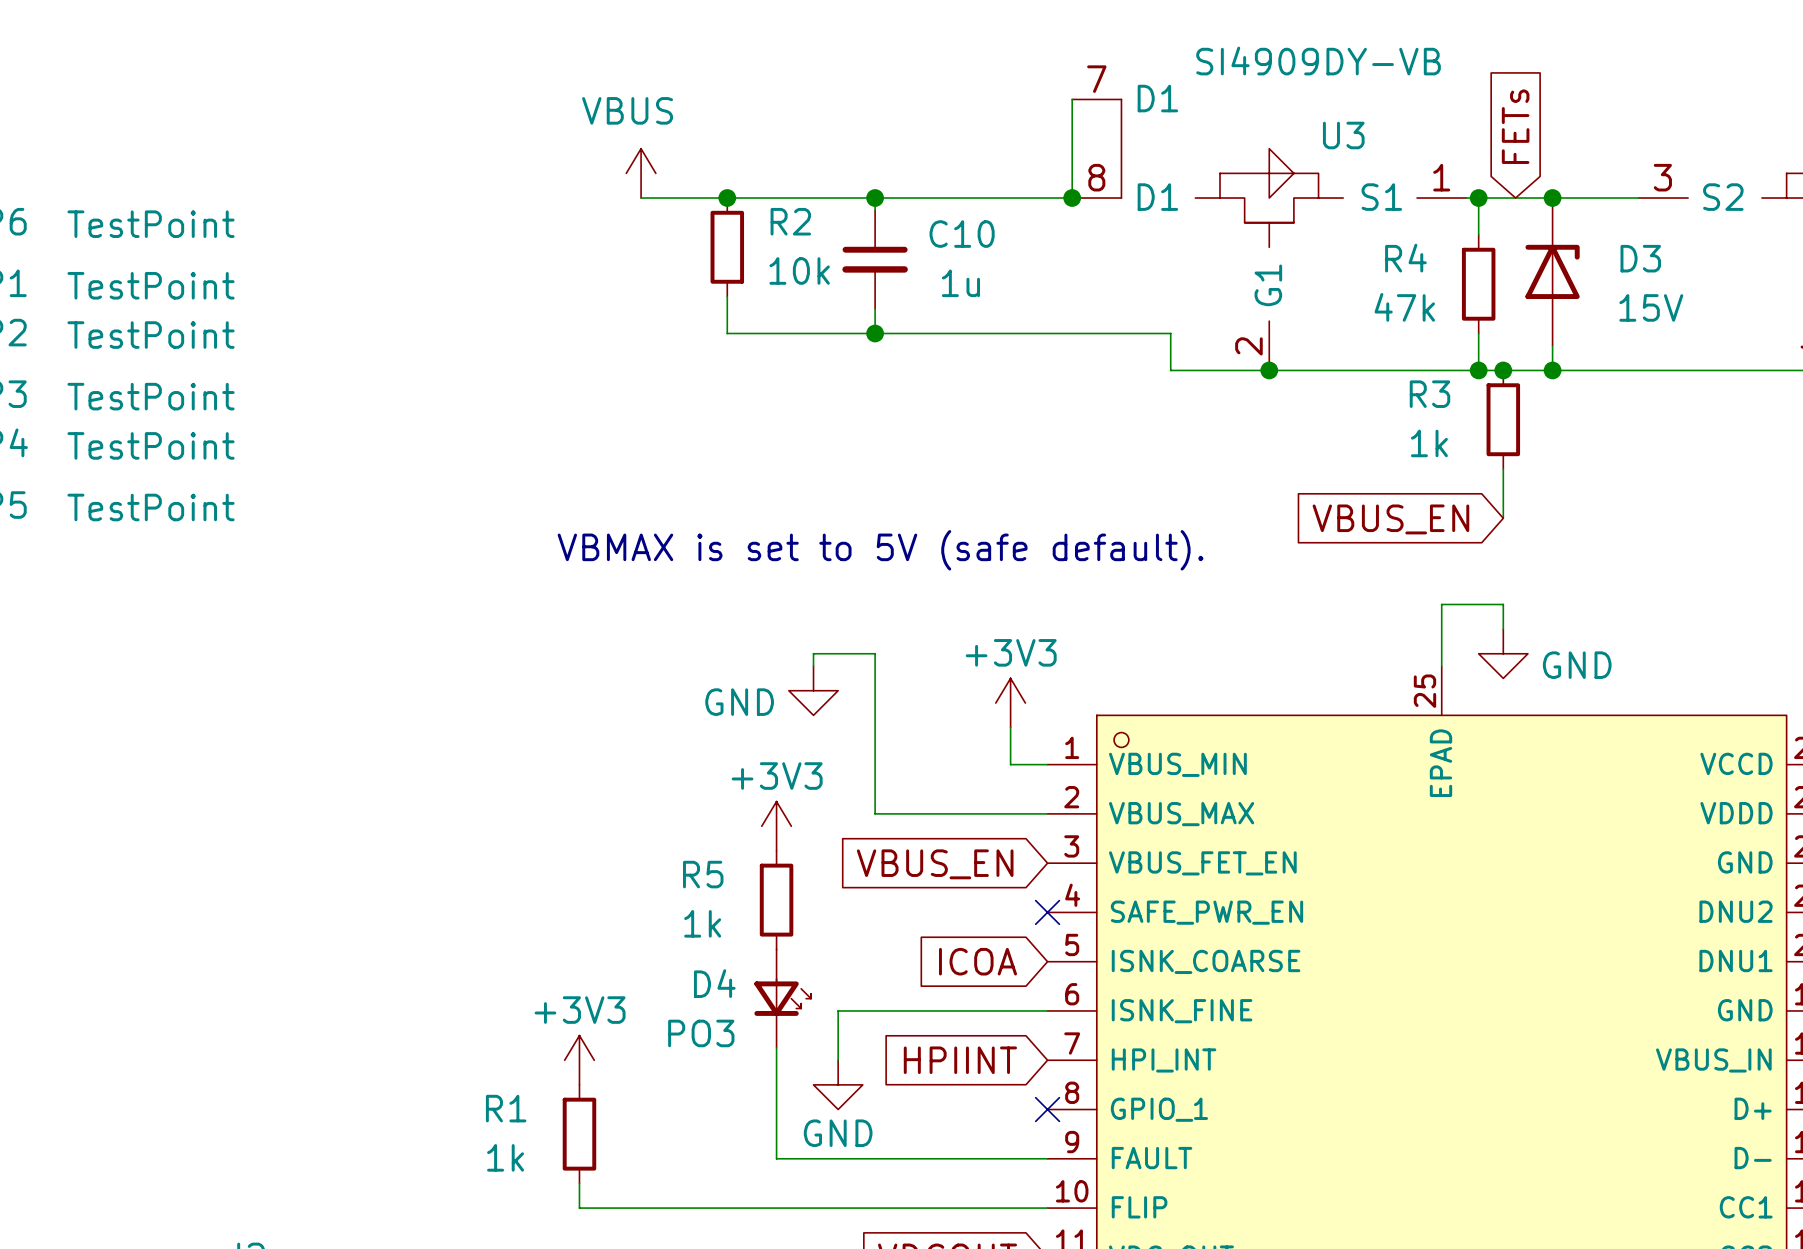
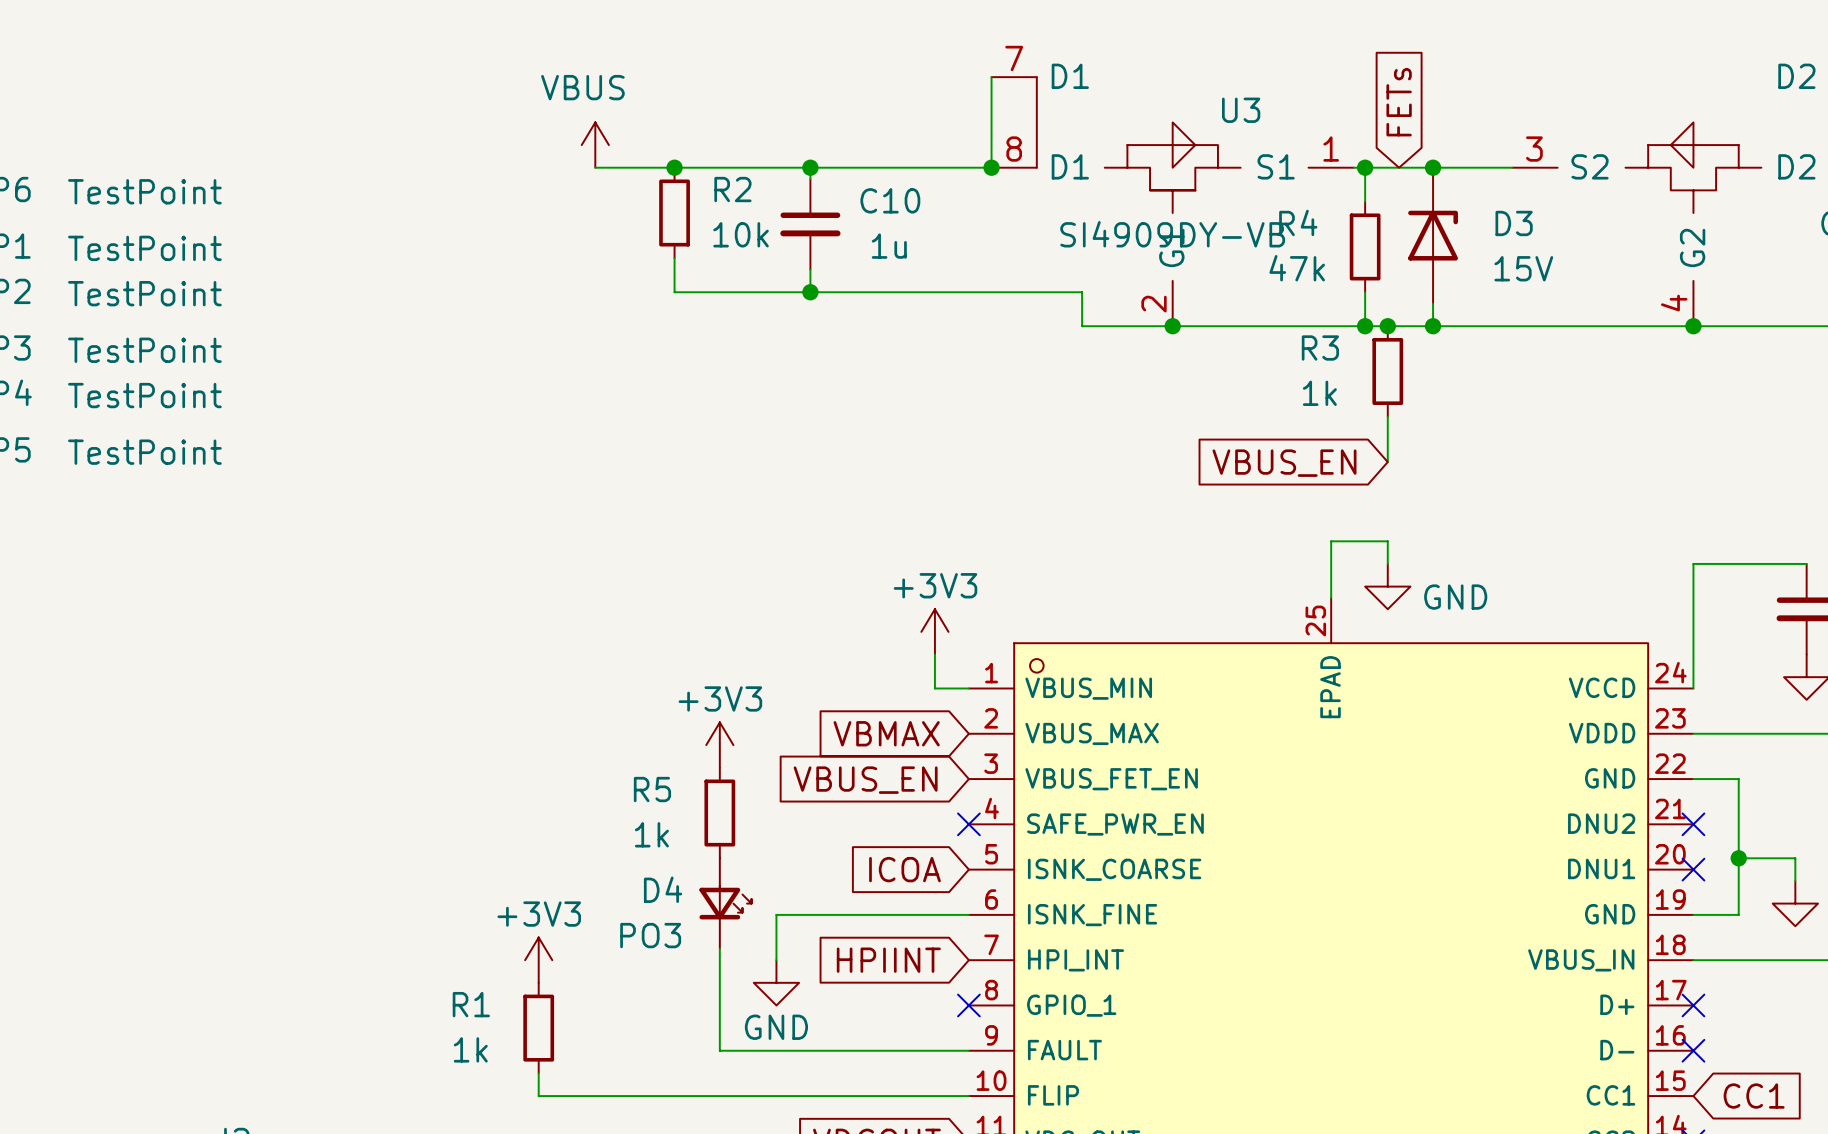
U3 value position: SI4909DY-VB (1318, 61) -> SI4909DY-VB (1172, 234)
text: VBMAX is set to 5V (safe default). (880, 550) -> none
wire: (813, 666) (813, 653) (875, 653) (875, 813) (1047, 813) -> none
power symbol: GND (813, 690) -> none
global label: none -> VBMAX (886, 733)

